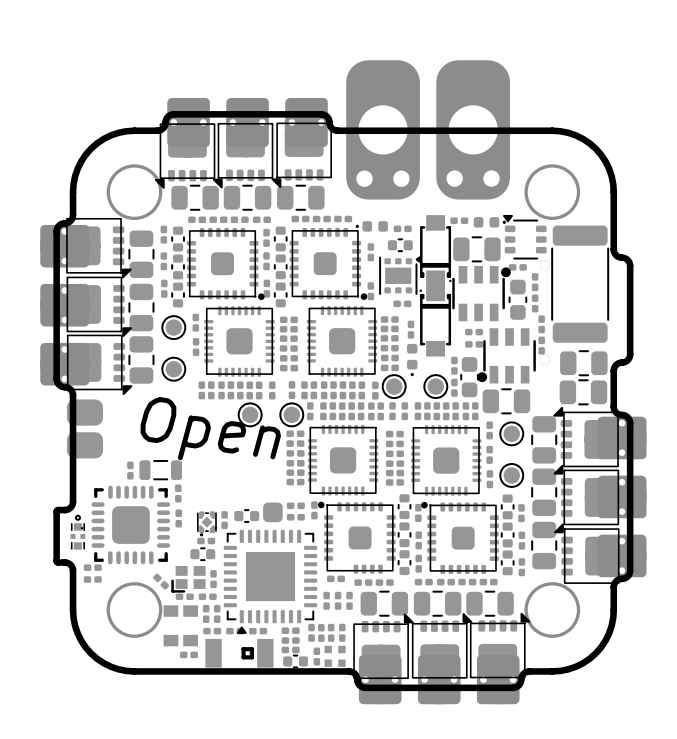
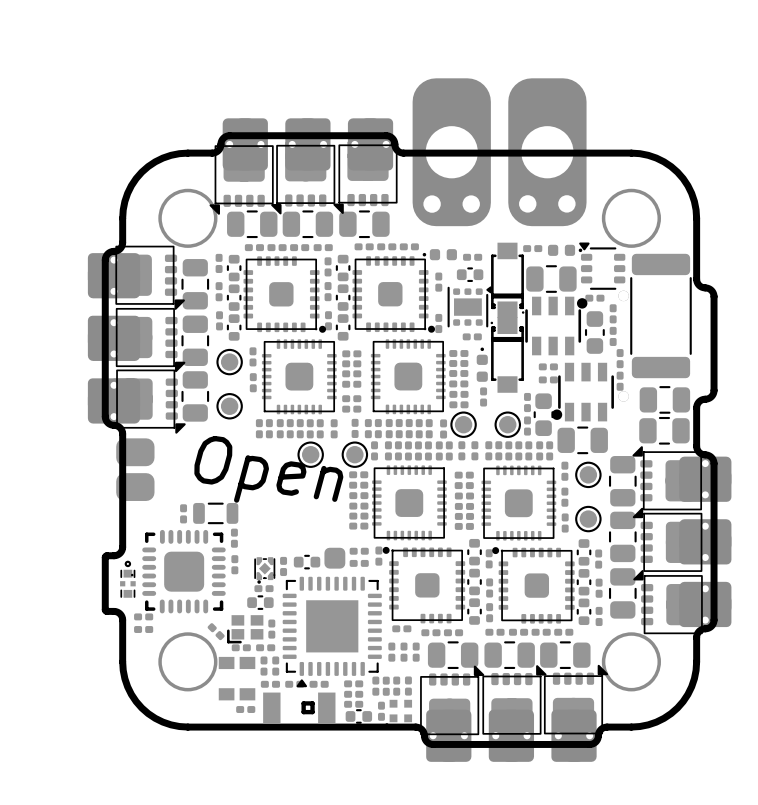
part footprint: [186, 227, 265, 300] -> [243, 256, 327, 333]
part footprint: [407, 320, 415, 339] -> [476, 347, 488, 382]
part footprint: [406, 343, 418, 377] -> [480, 387, 488, 407]
part: (288, 358) -> none
part: none -> (351, 398)
part: (288, 368) -> none
part: none -> (351, 409)
part footprint: [421, 501, 499, 574] -> [492, 547, 575, 624]

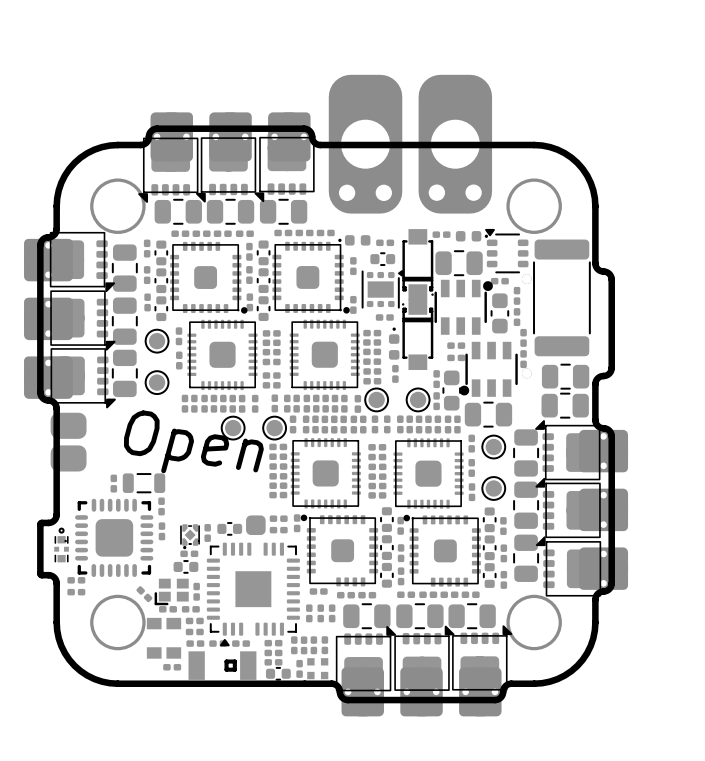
part footprint: [282, 576, 382, 688] -> [206, 542, 300, 647]
part: none -> (194, 620)
part: (263, 666) -> none
part: (275, 666) -> none
part: none -> (194, 631)

